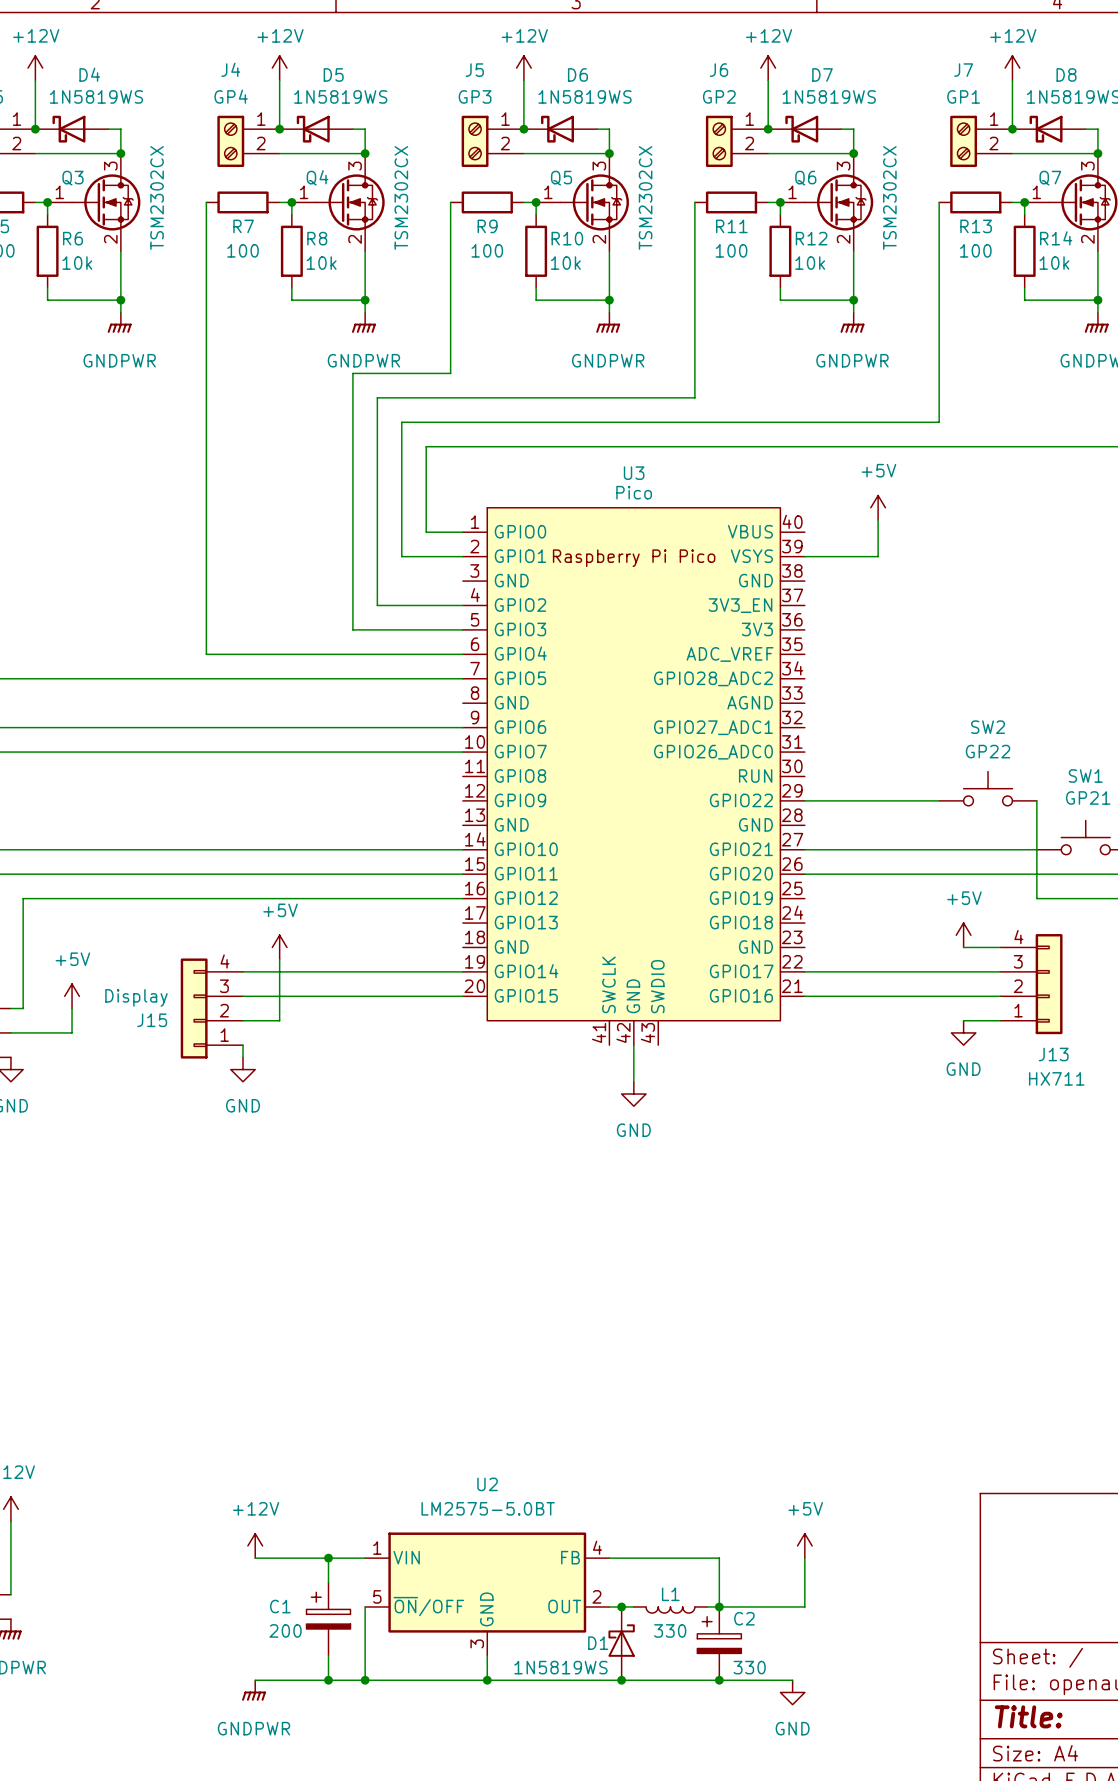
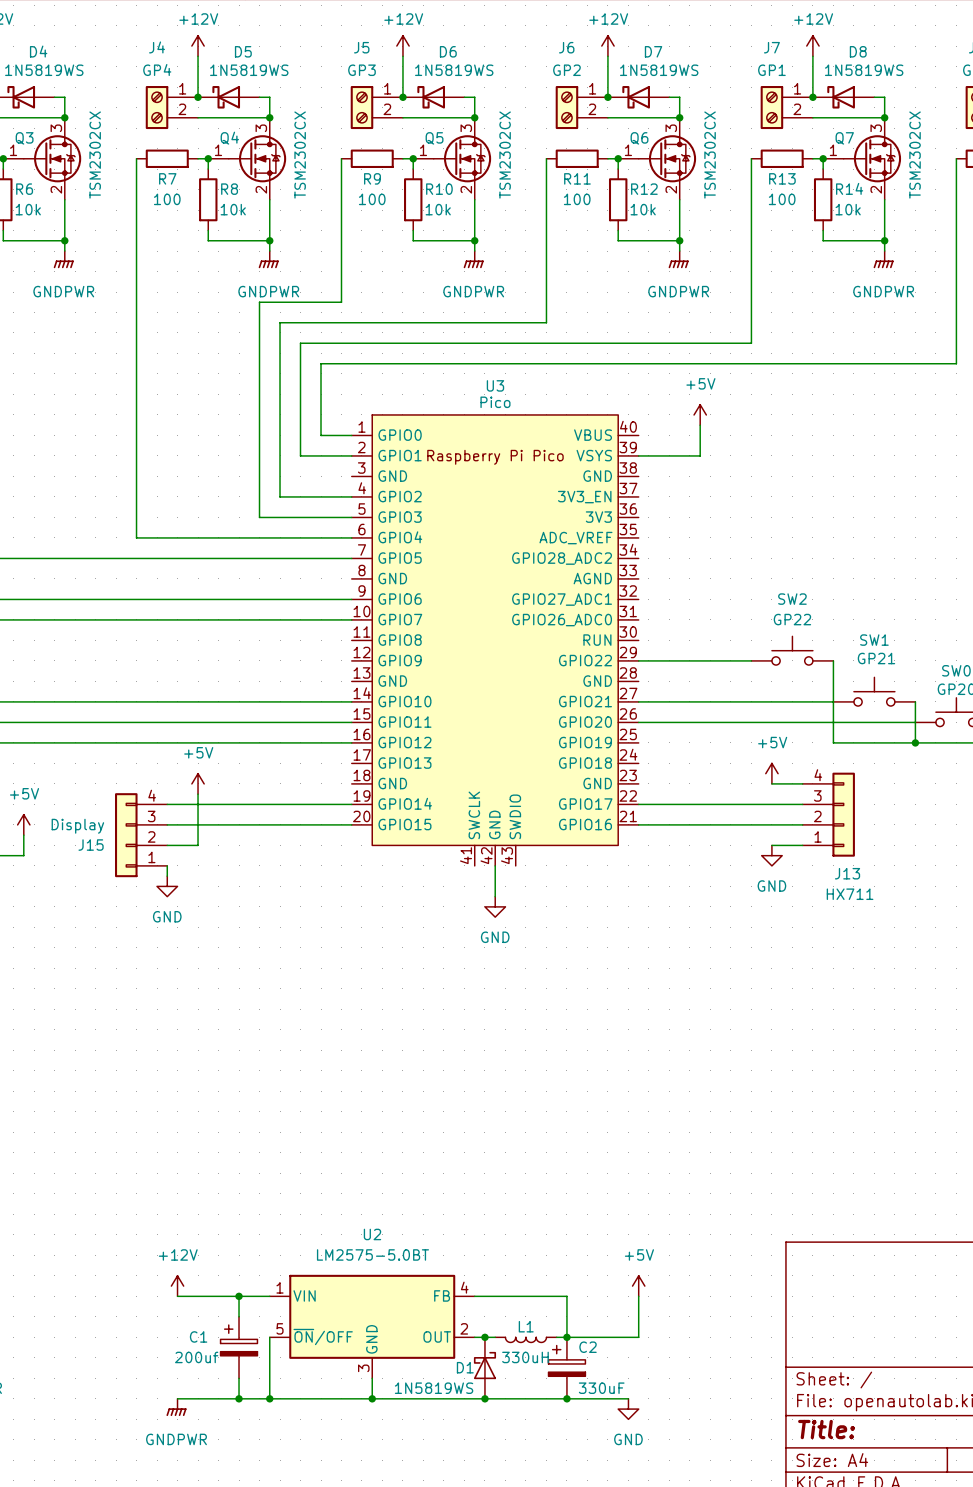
C1 value: 200 (285, 1630) -> 200uf (196, 1357)
L1 value: 330 (670, 1630) -> 330uH (525, 1357)
C2 value: 330 (749, 1667) -> 330uF (601, 1388)

